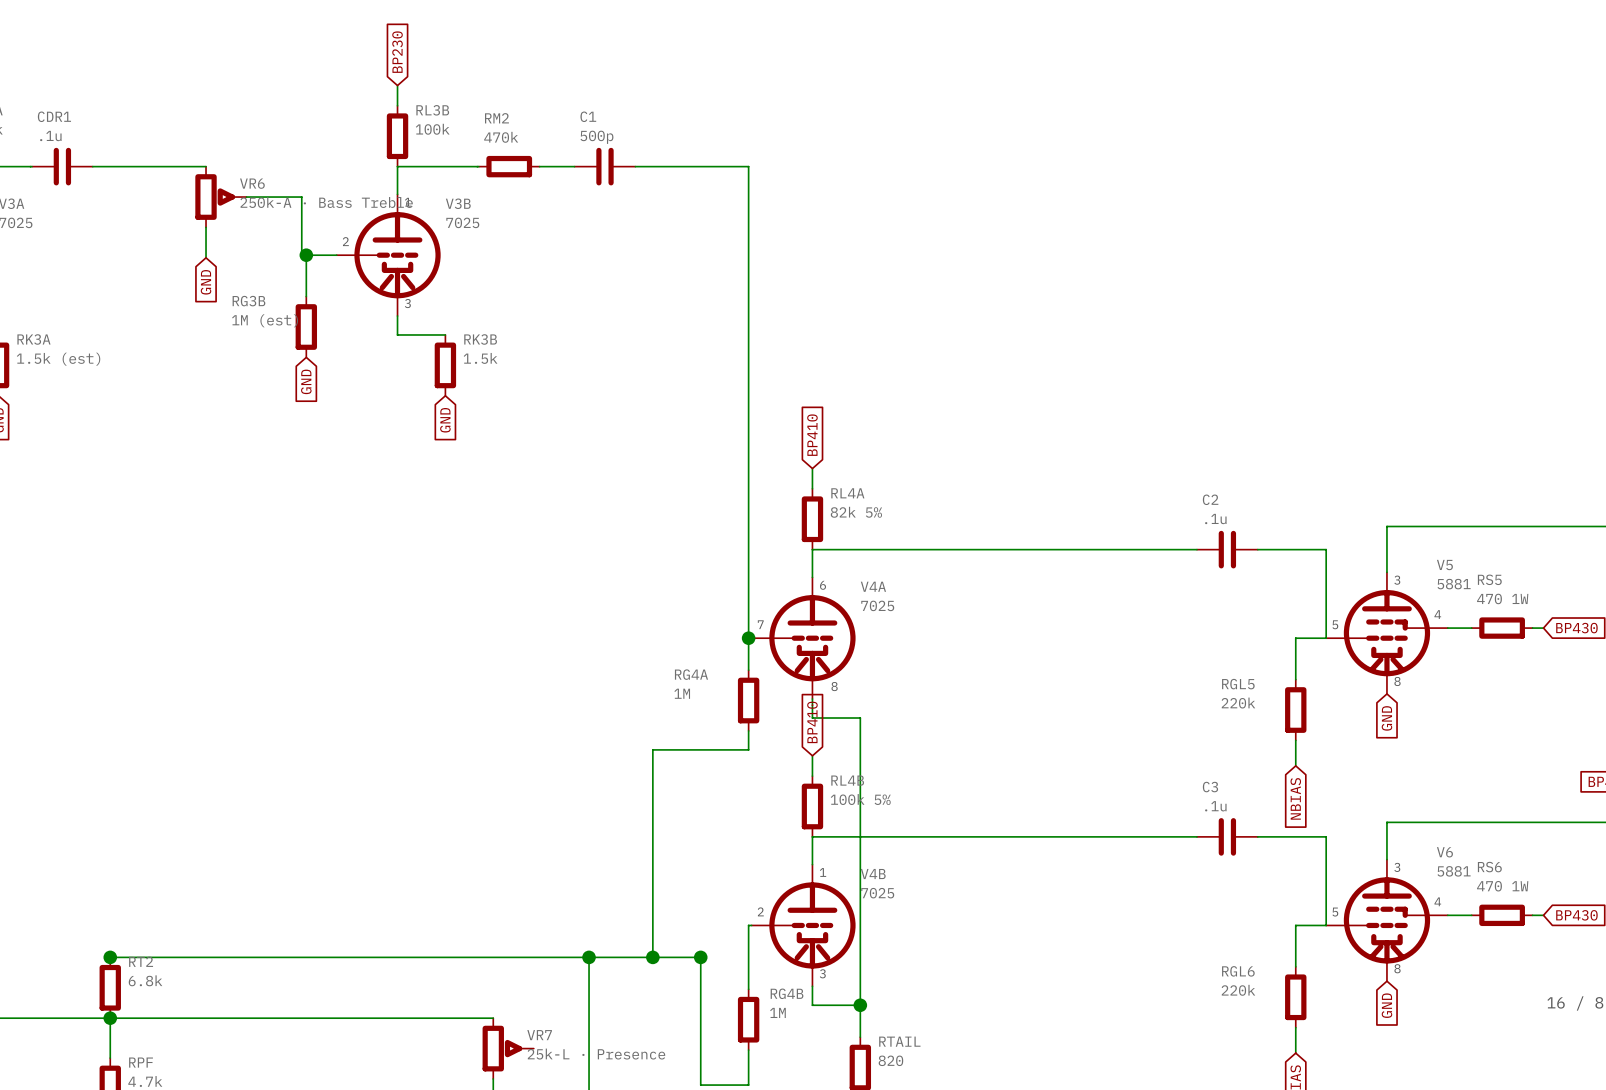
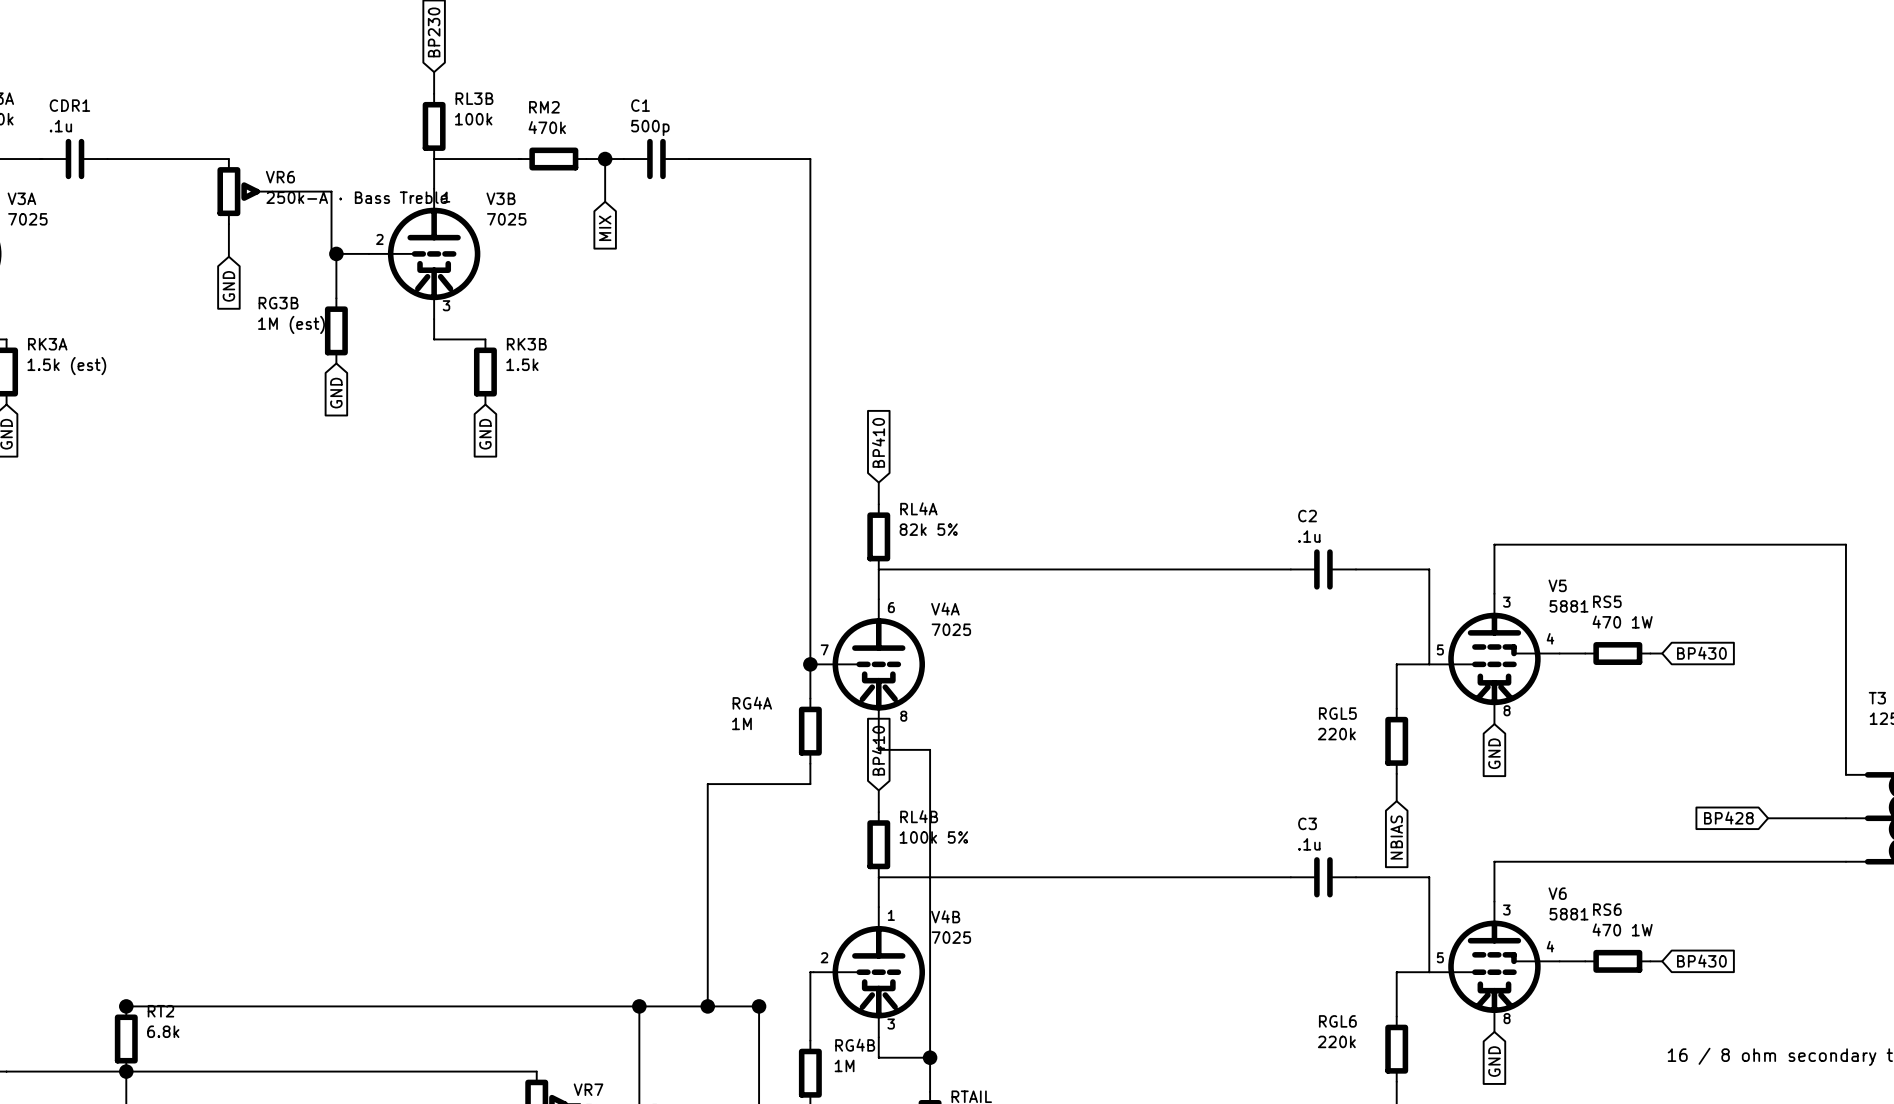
wire: none -> (605, 159) (605, 201)
junction: none -> (605, 159)
global label: none -> MIX (605, 228)

